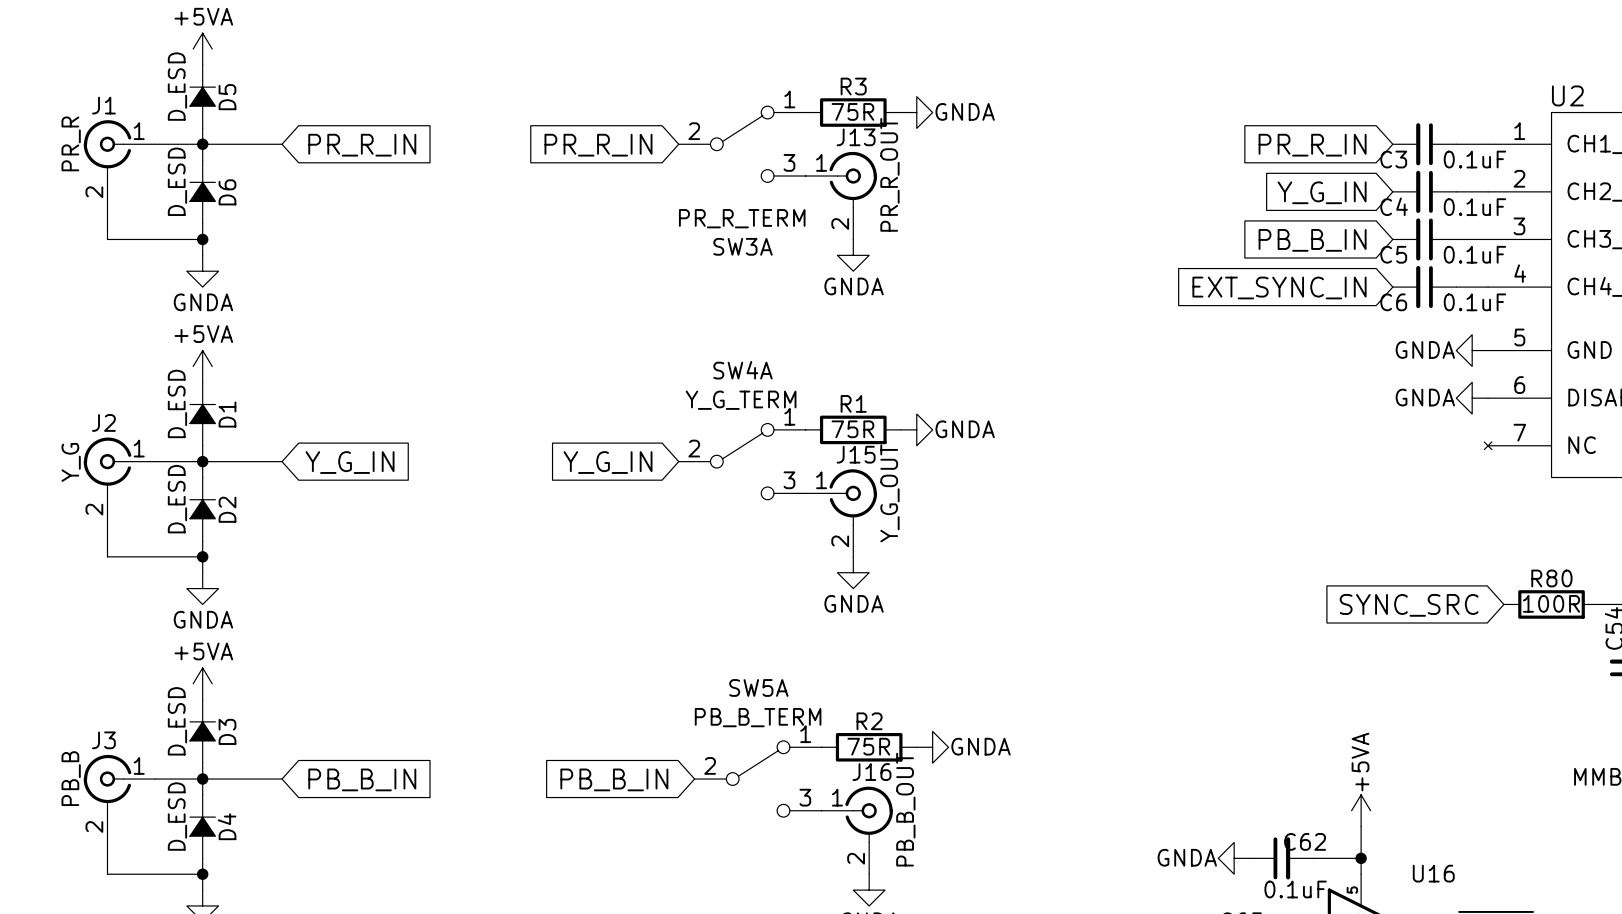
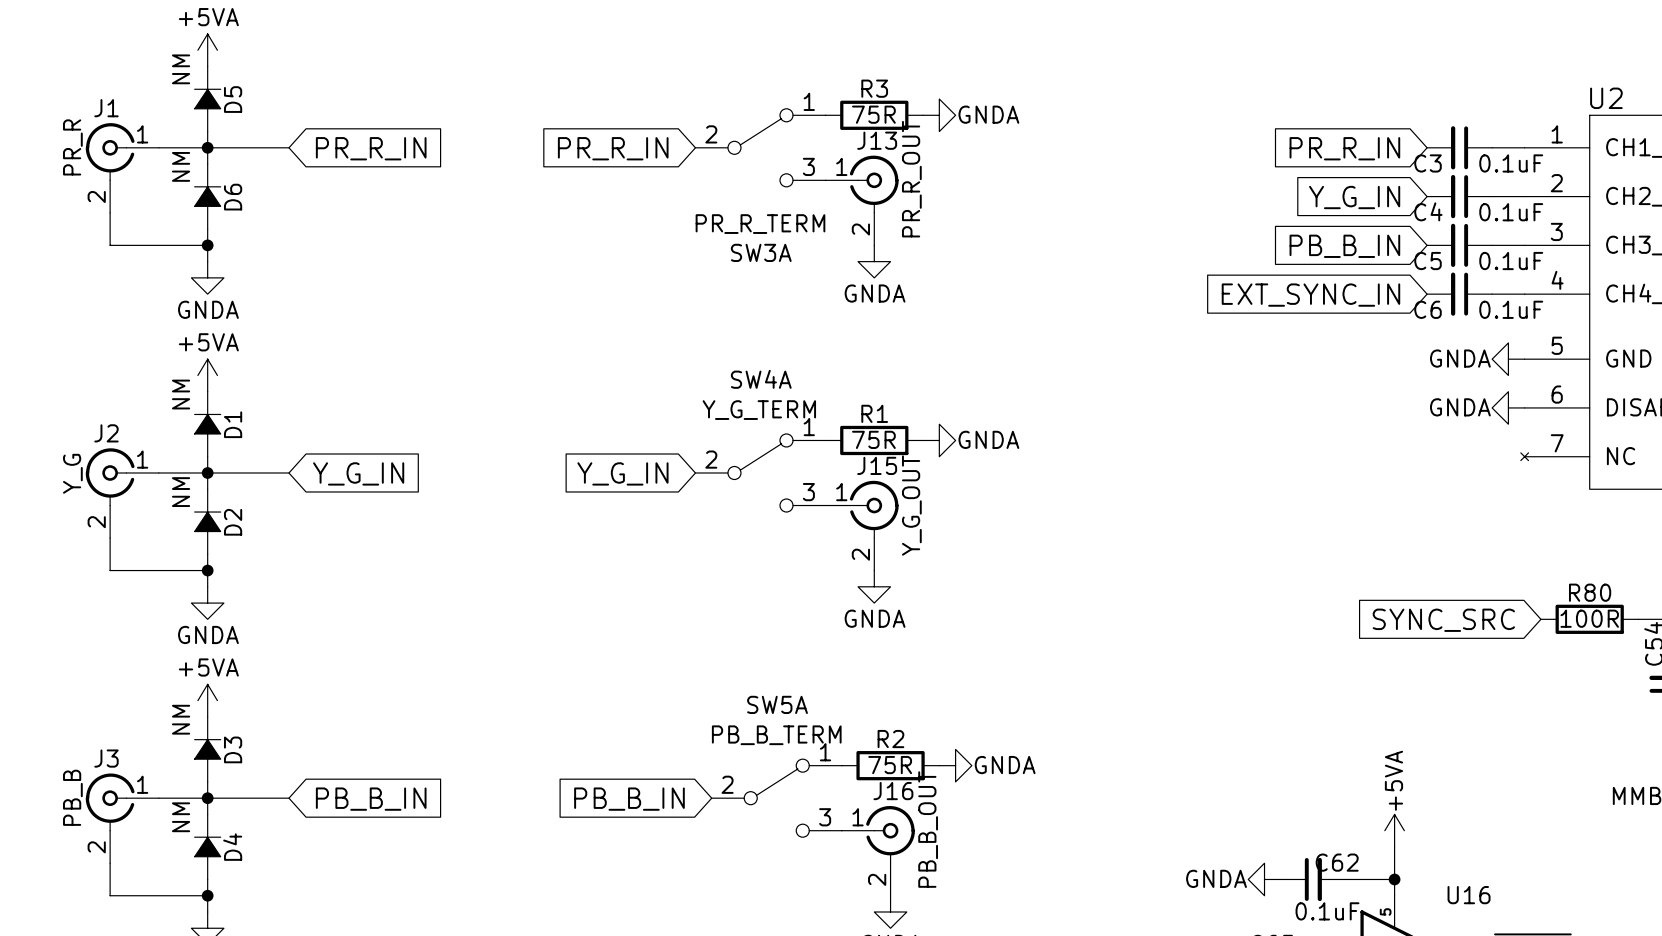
D5 value: D_ESD (177, 86) -> NM (181, 69)
D6 value: D_ESD (177, 181) -> NM (181, 166)
D1 value: D_ESD (177, 403) -> NM (181, 394)
D2 value: D_ESD (177, 499) -> NM (181, 492)
D3 value: D_ESD (177, 721) -> NM (181, 719)
D4 value: D_ESD (177, 816) -> NM (181, 817)

